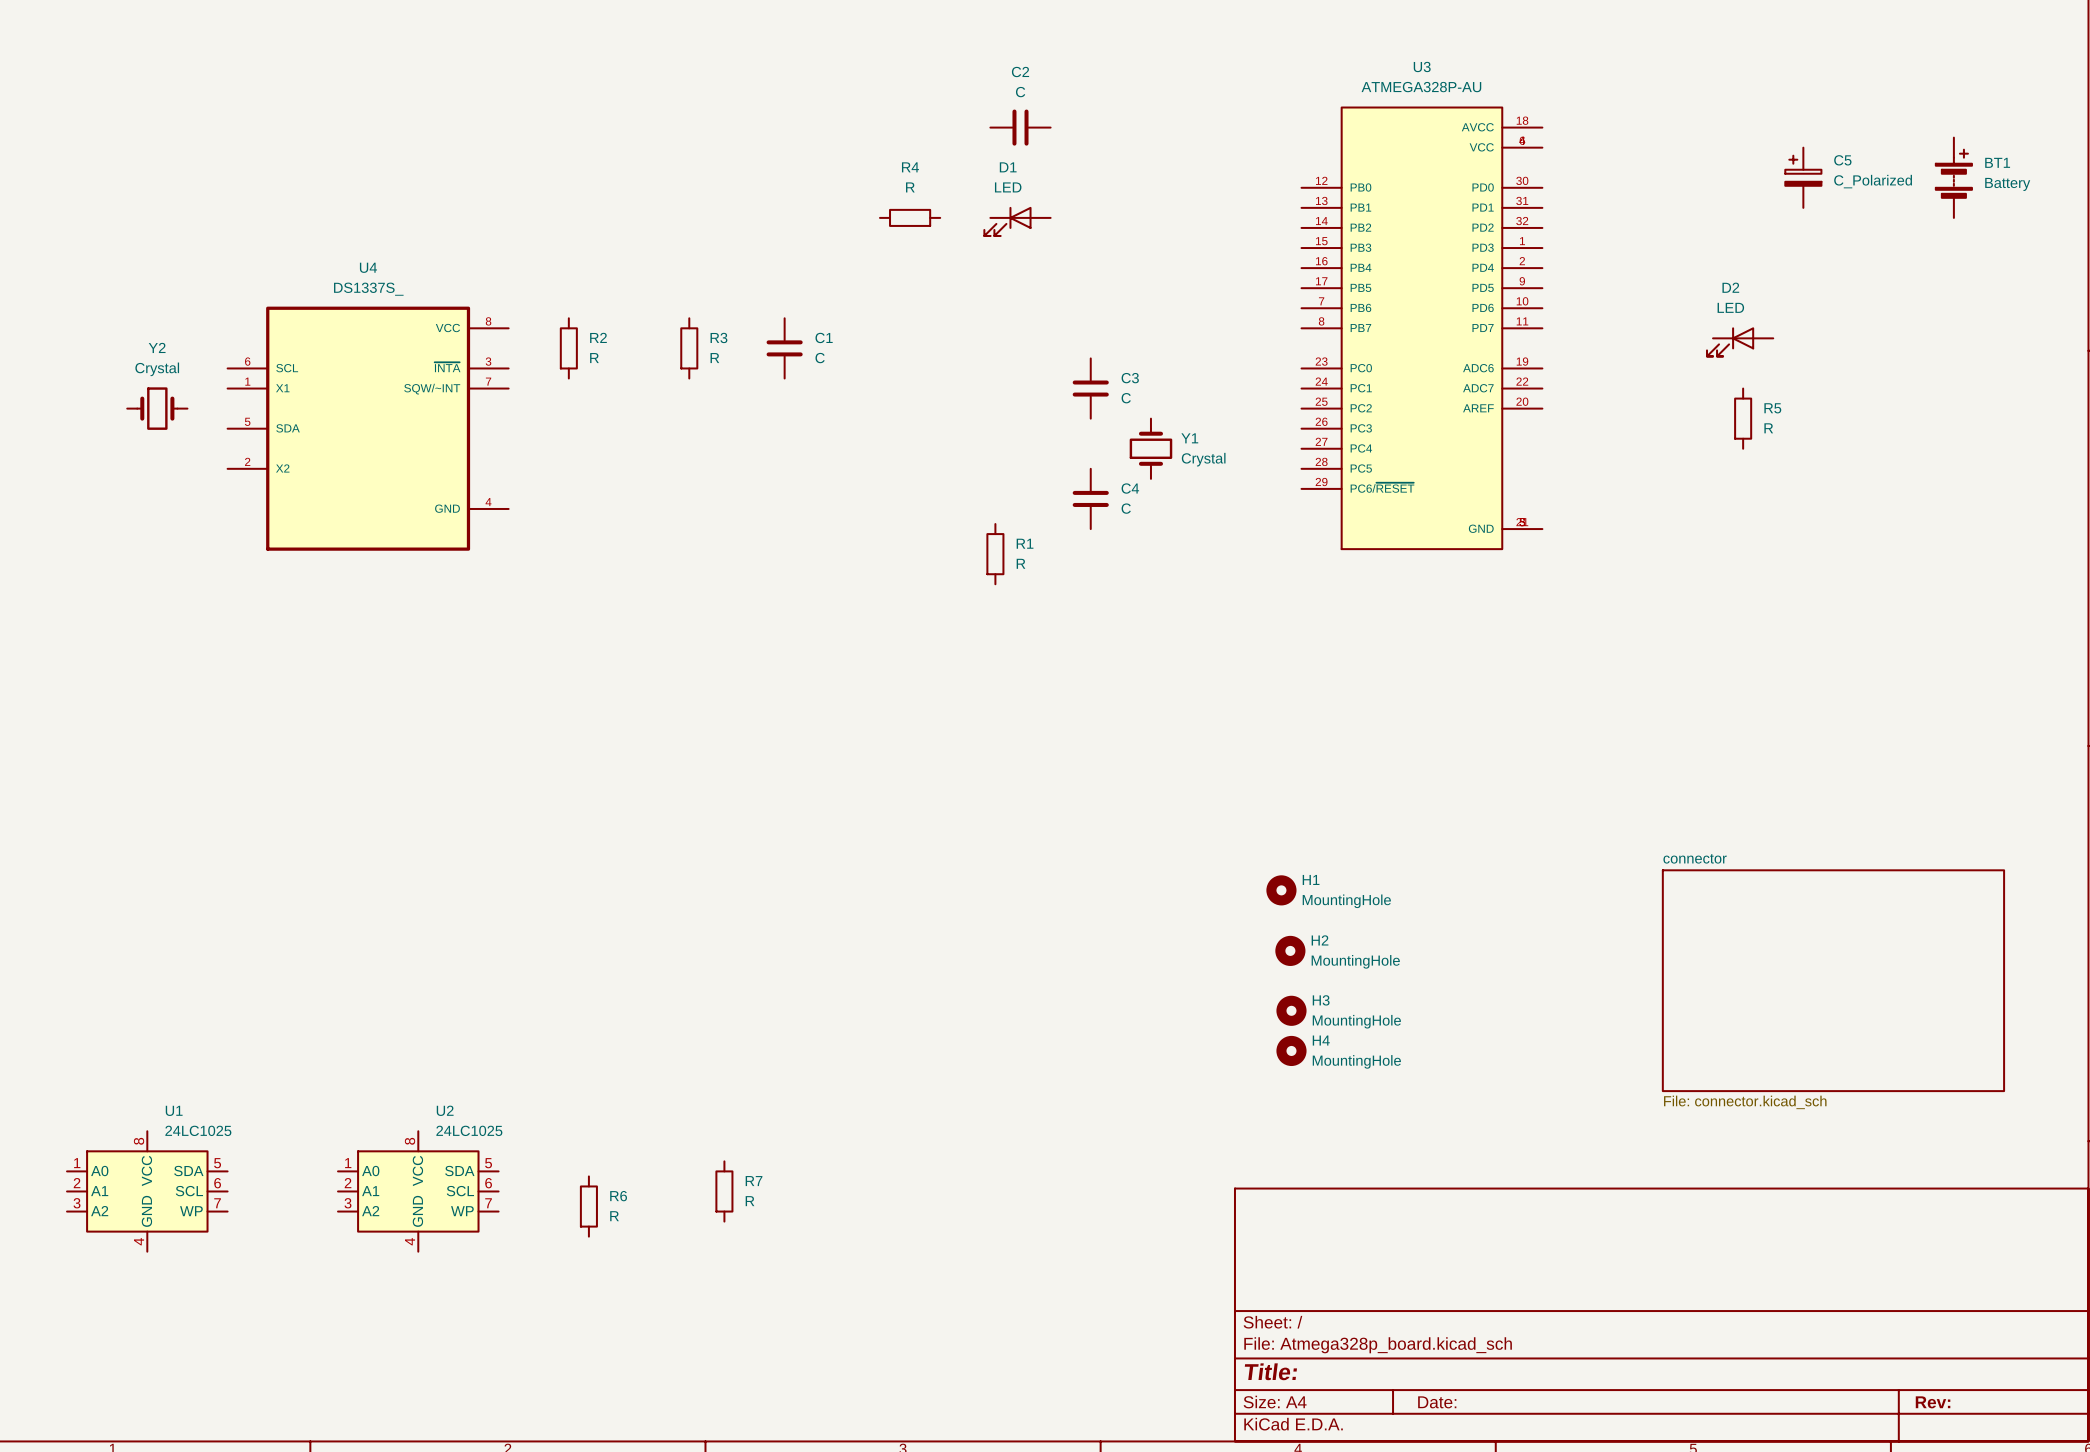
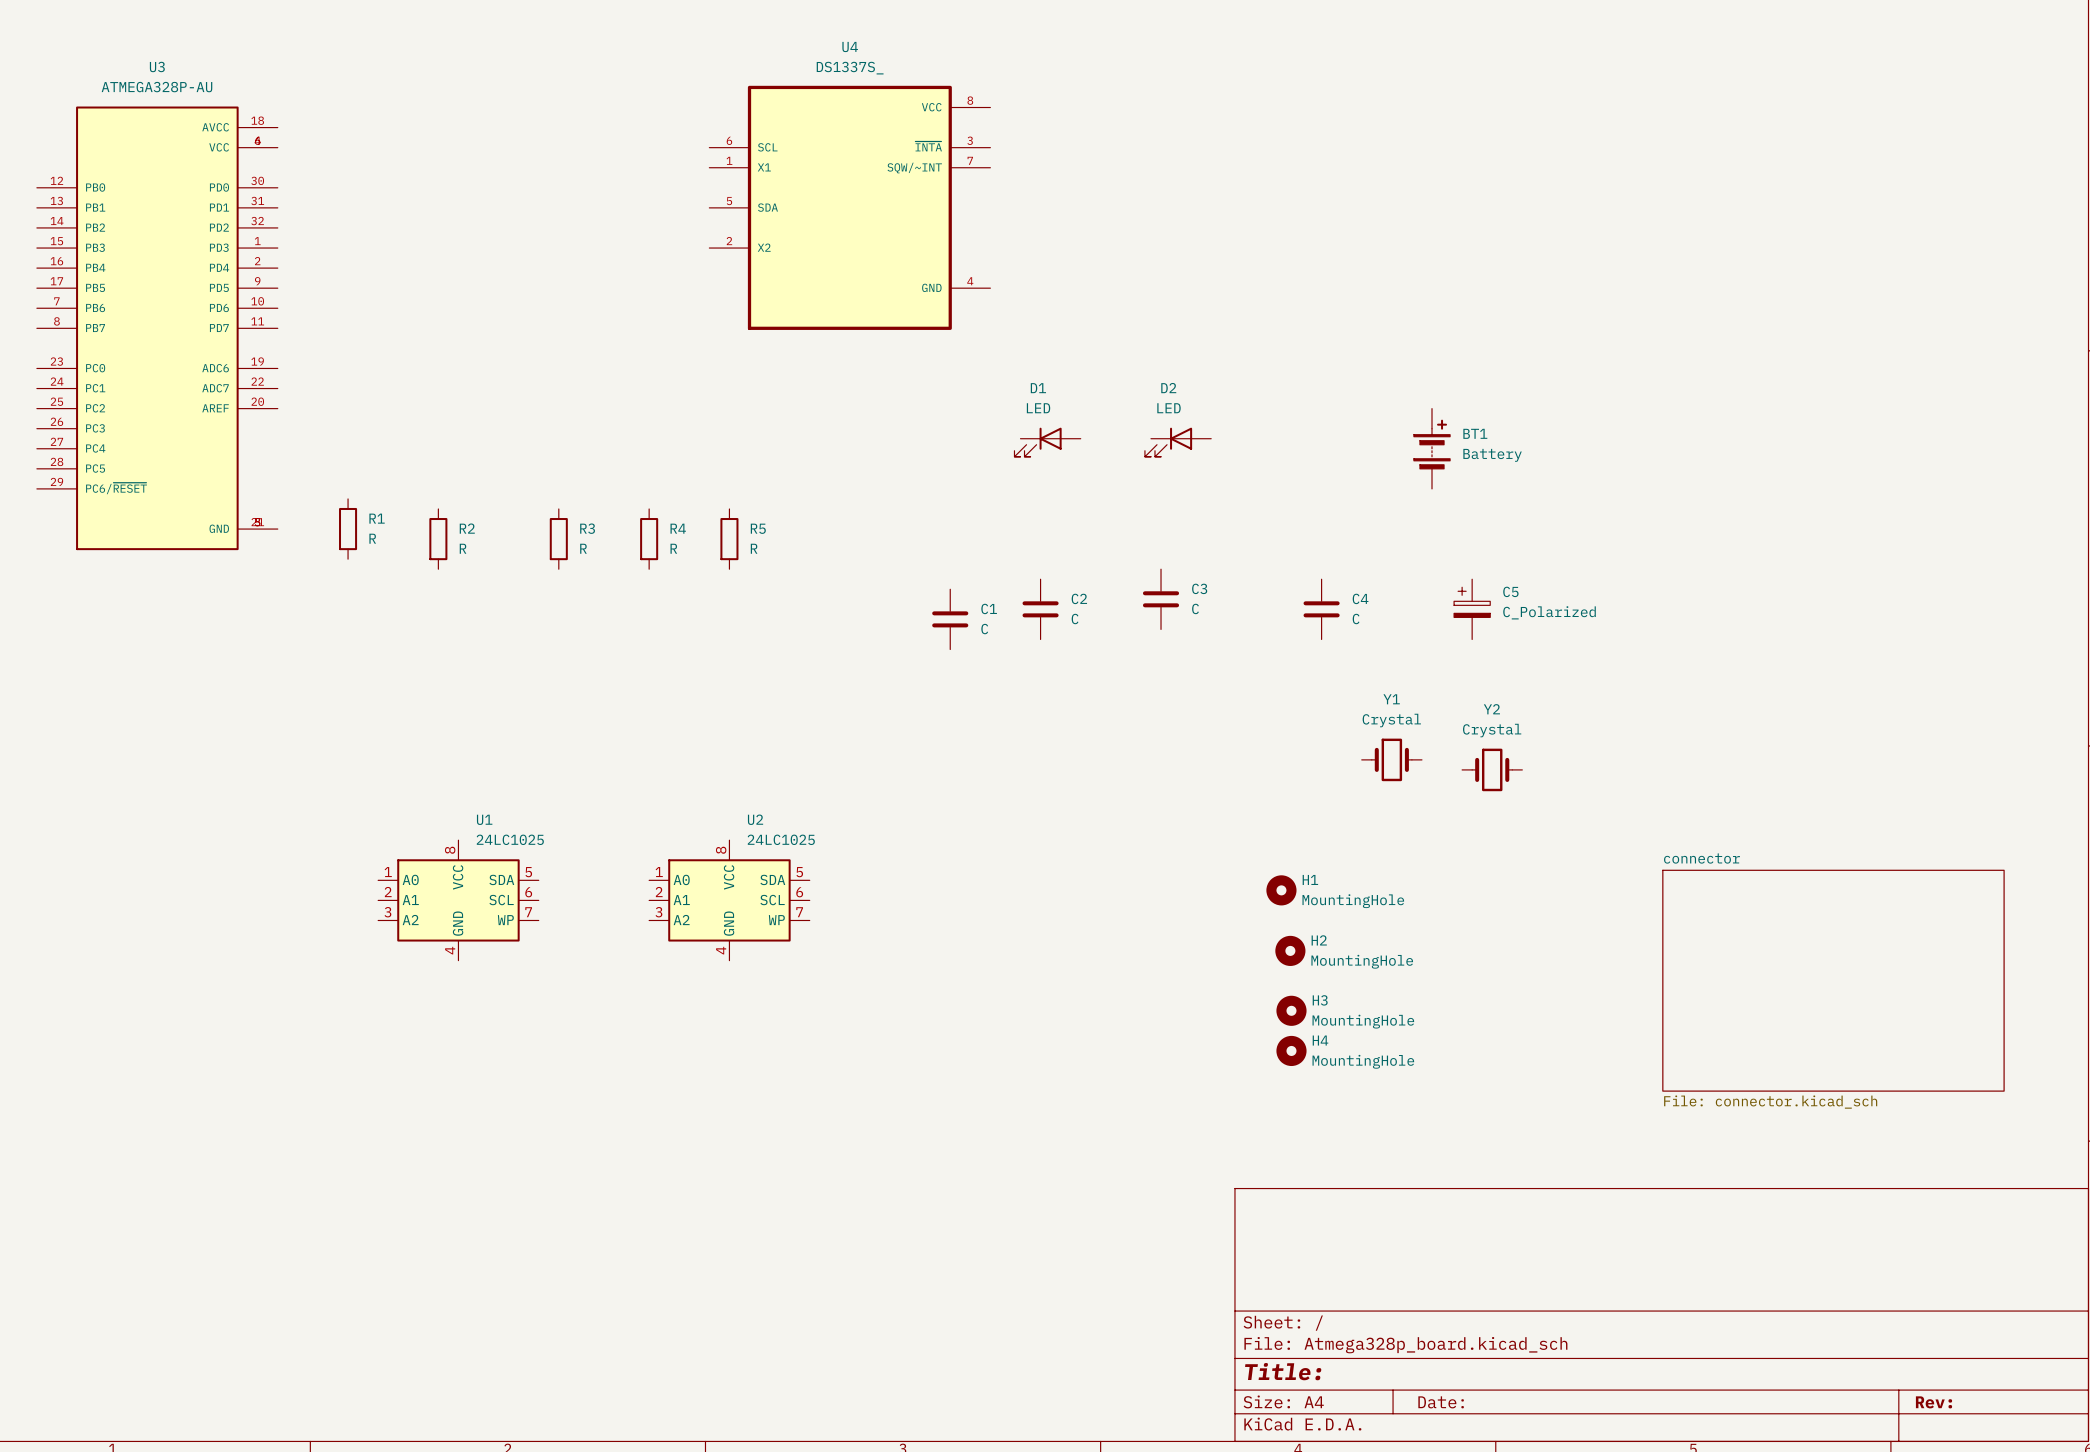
C2 name position: C2 (1020, 72) -> C2 (1079, 598)
C2 rotation: 0° (1020, 127) -> 90° clockwise (1040, 609)
C2 position: (1020, 127) -> (1040, 609)
R4 name position: R4 (910, 167) -> R4 (678, 528)
C5 position: (1803, 177) -> (1472, 609)
BT1 position: (1953, 177) -> (1432, 448)
R4 rotation: 0° (910, 217) -> 90° clockwise (649, 539)
R4 position: (910, 217) -> (649, 539)
D1 position: (1017, 221) -> (1047, 442)
U3 position: (1421, 328) -> (157, 328)
D2 position: (1740, 341) -> (1178, 442)
R2 position: (568, 348) -> (438, 539)
R3 position: (689, 348) -> (558, 539)
C1 position: (784, 348) -> (950, 619)
C3 position: (1090, 388) -> (1161, 599)
Y2 position: (157, 408) -> (1492, 769)
R5 position: (1743, 418) -> (729, 539)
U4 position: (368, 428) -> (849, 207)
Y1 name position: Y1 (1189, 438) -> Y1 (1391, 699)
Y1 rotation: 0° (1150, 448) -> 90° clockwise (1391, 759)
Y1 position: (1150, 448) -> (1391, 759)
Y1 value position: Crystal (1203, 459) -> Crystal (1391, 720)
C4 position: (1090, 498) -> (1321, 609)
R1 position: (995, 554) -> (348, 529)
U1 position: (147, 1191) -> (458, 900)
U2 position: (418, 1191) -> (729, 900)
R7: R (724, 1191) -> none
R6: R (588, 1206) -> none

